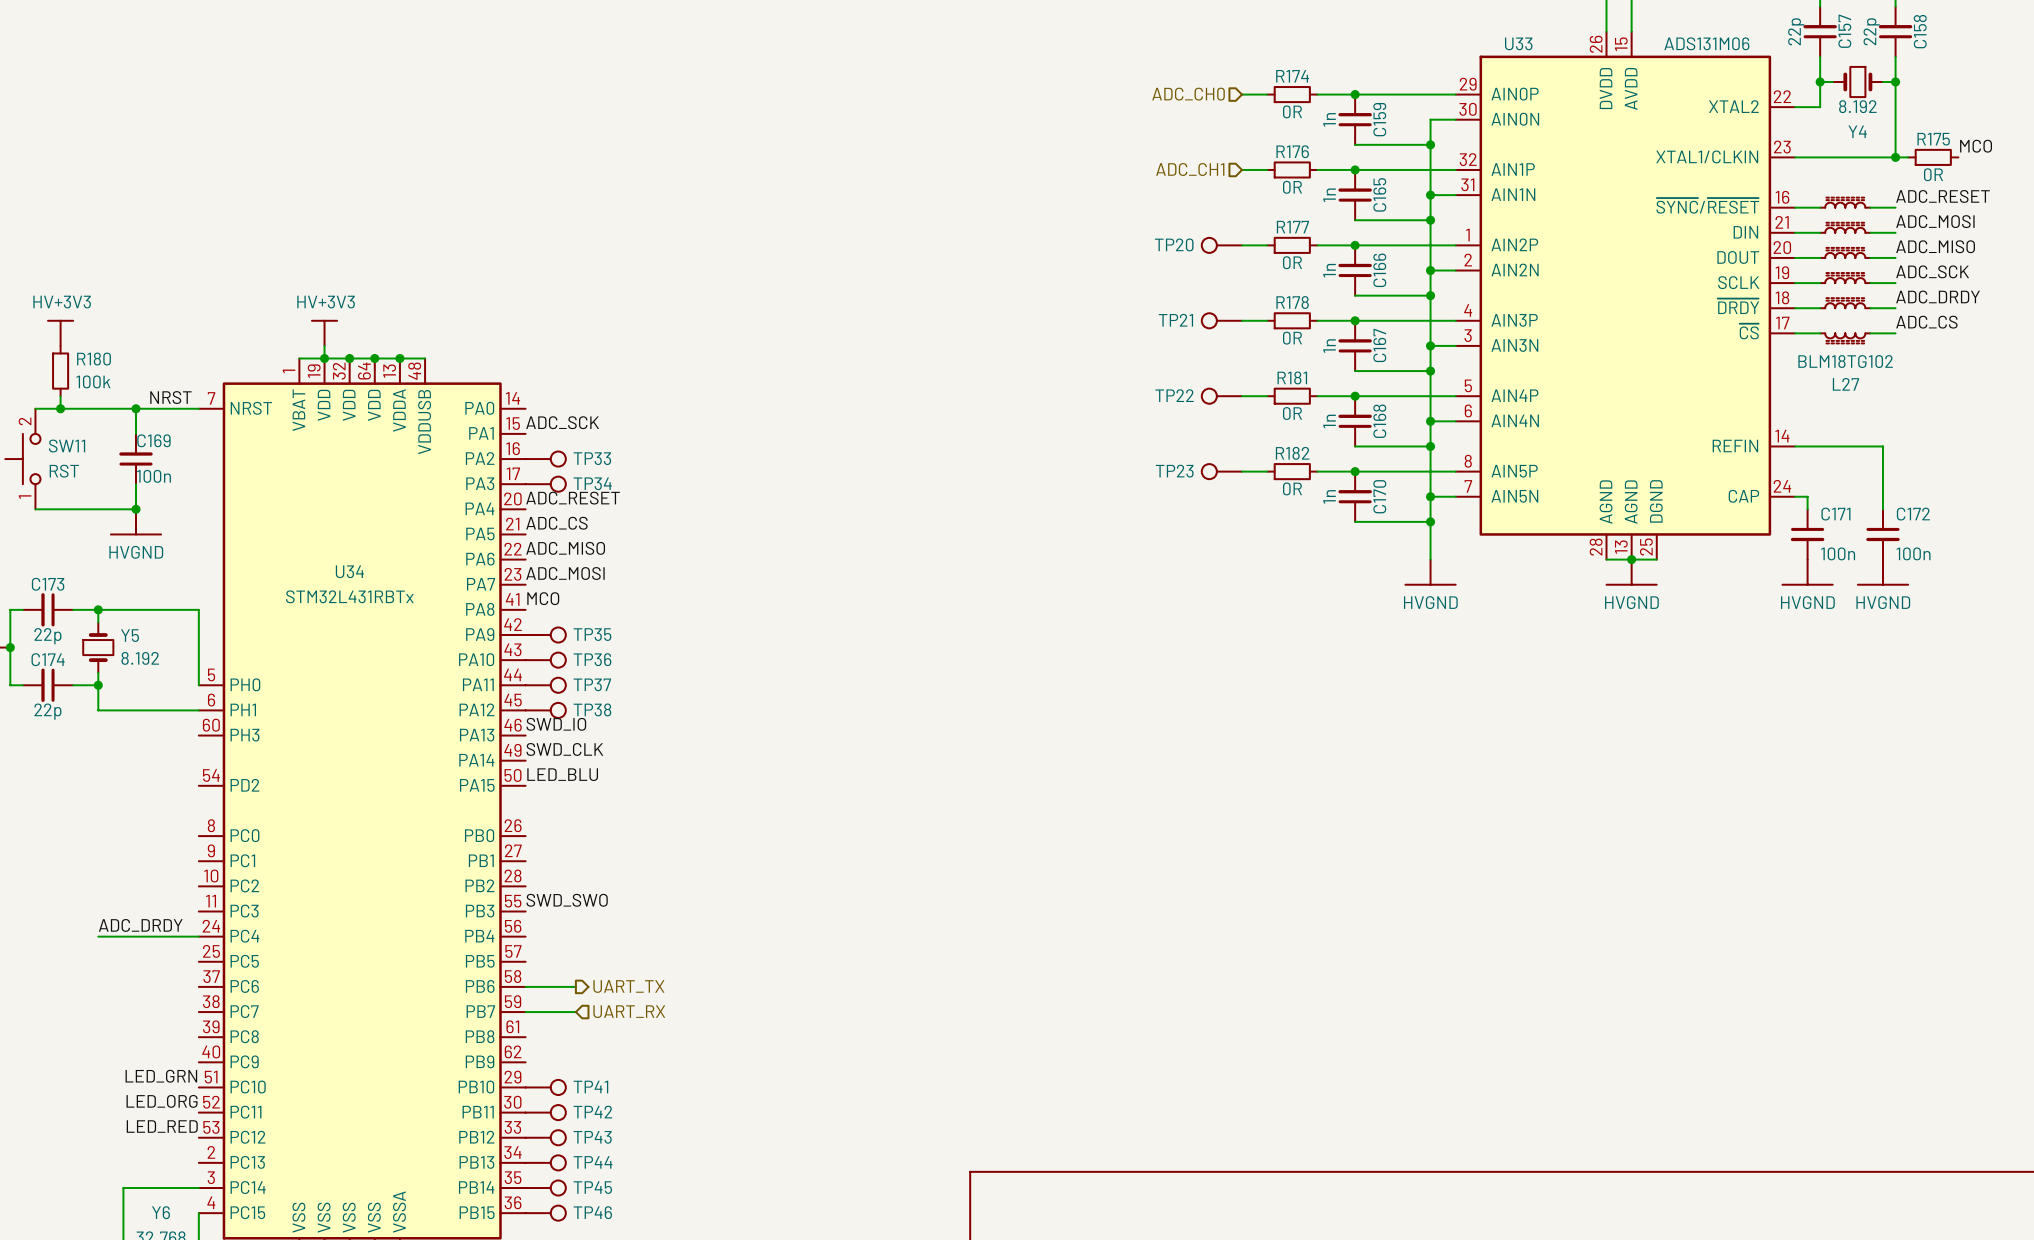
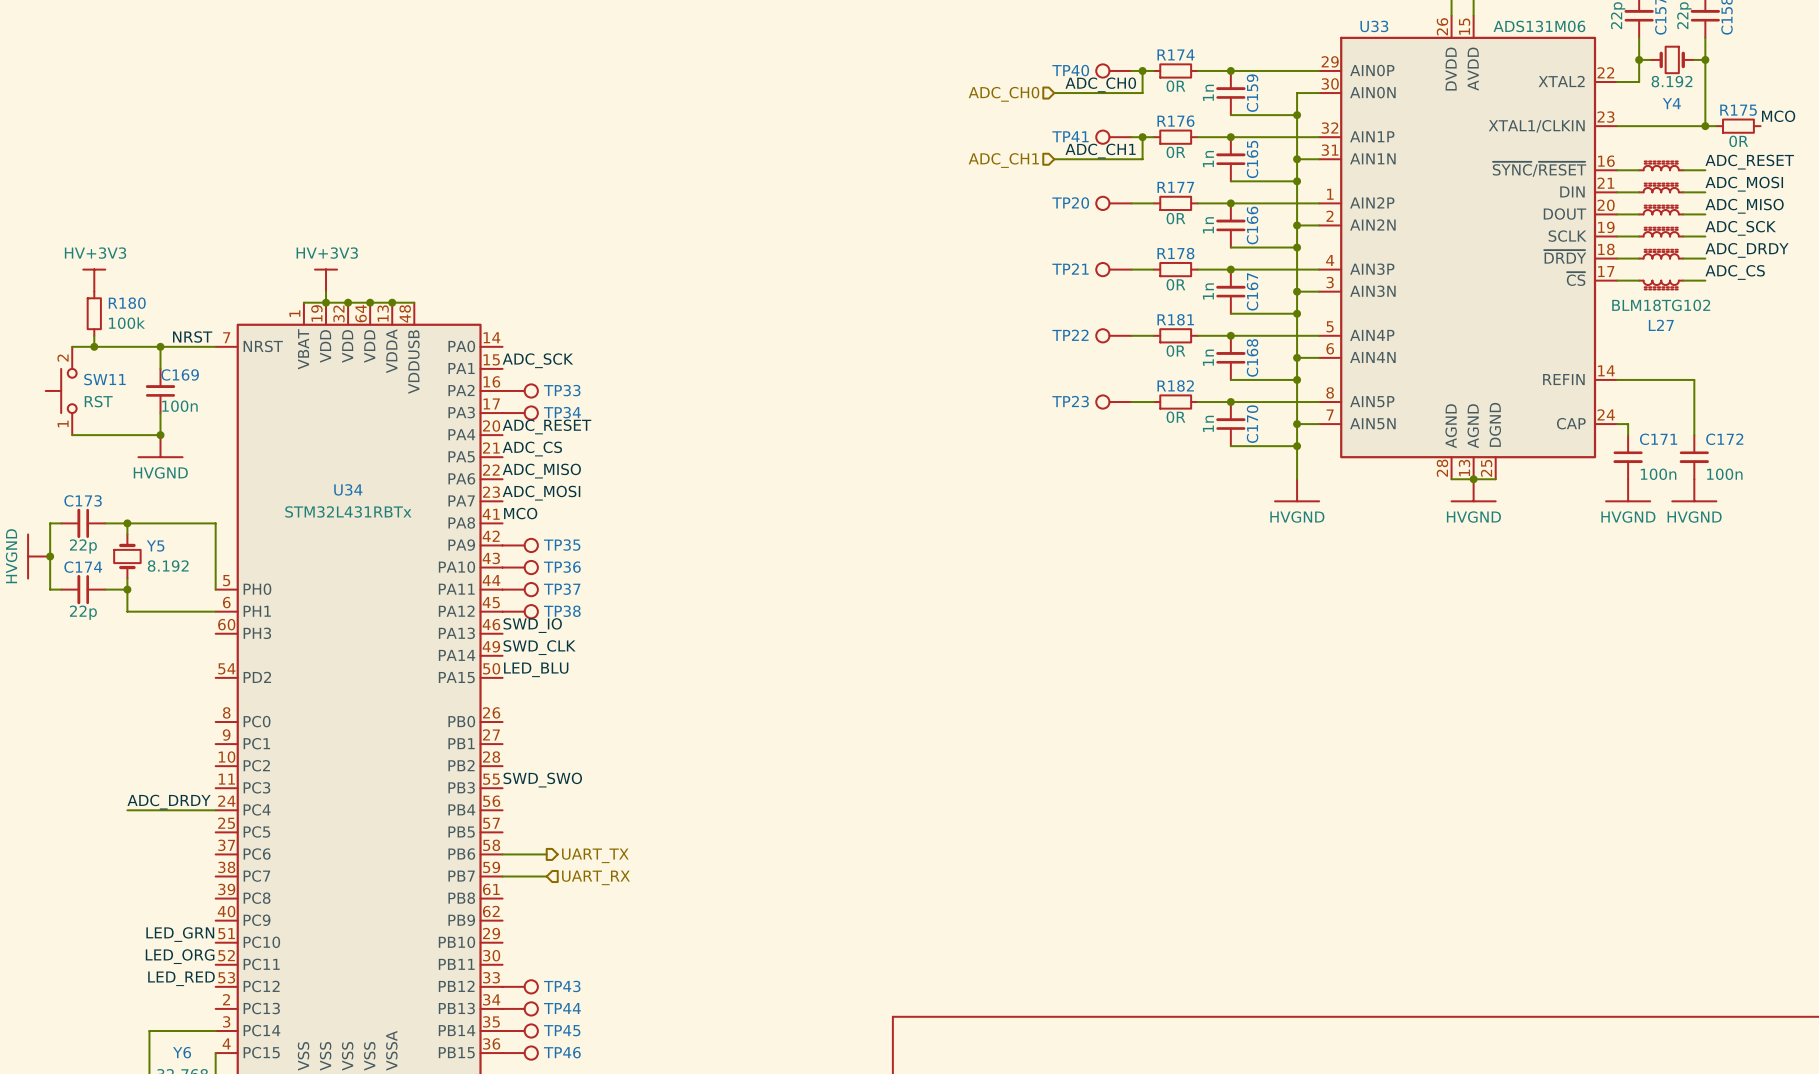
hierarchical label position: ADC_CH0 (1188, 94) -> ADC_CH0 (1003, 94)
TP40: none -> (1113, 70)
wire: none -> (1142, 70) (1142, 93) (1054, 93)
junction: none -> (1142, 70)
label: none -> ADC_CH0 (1100, 84)
hierarchical label position: ADC_CH1 (1190, 169) -> ADC_CH1 (1003, 160)
wire: none -> (1142, 137) (1142, 159) (1054, 159)
junction: none -> (1142, 137)
label: none -> ADC_CH1 (1100, 151)
TP41 position: (545, 1087) -> (1113, 137)
TP41 rotation: 0° (558, 1087) -> 180° (1102, 137)
TP42: (545, 1112) -> none

